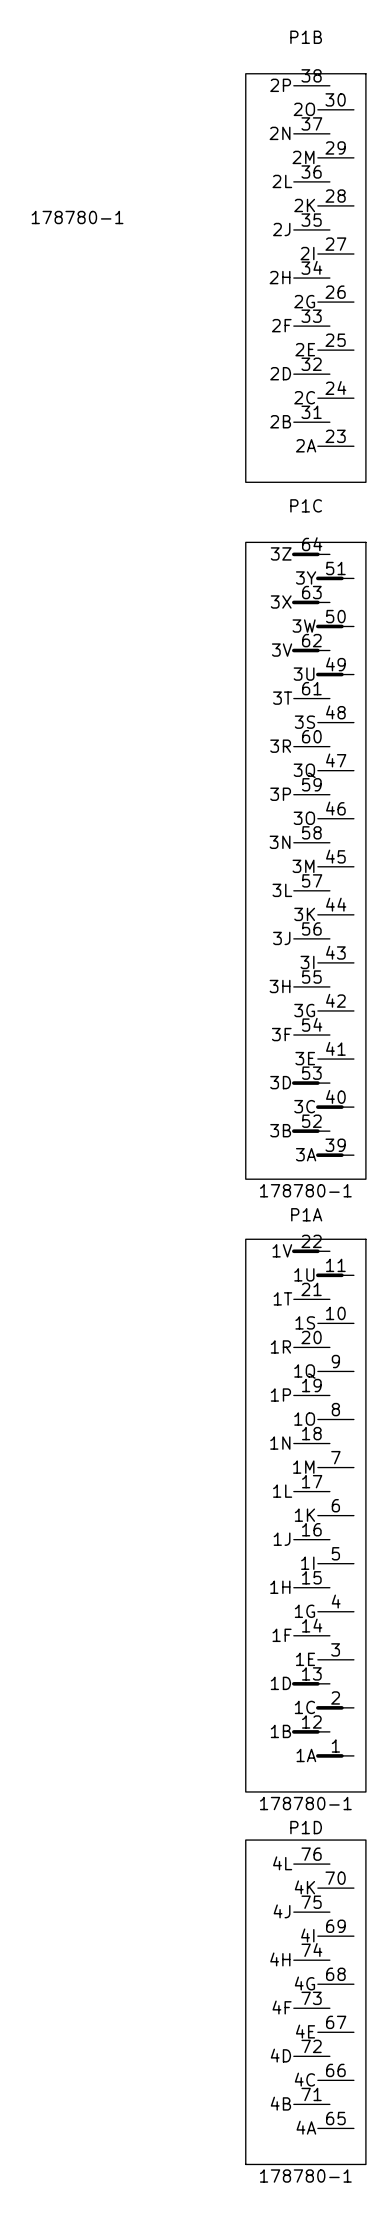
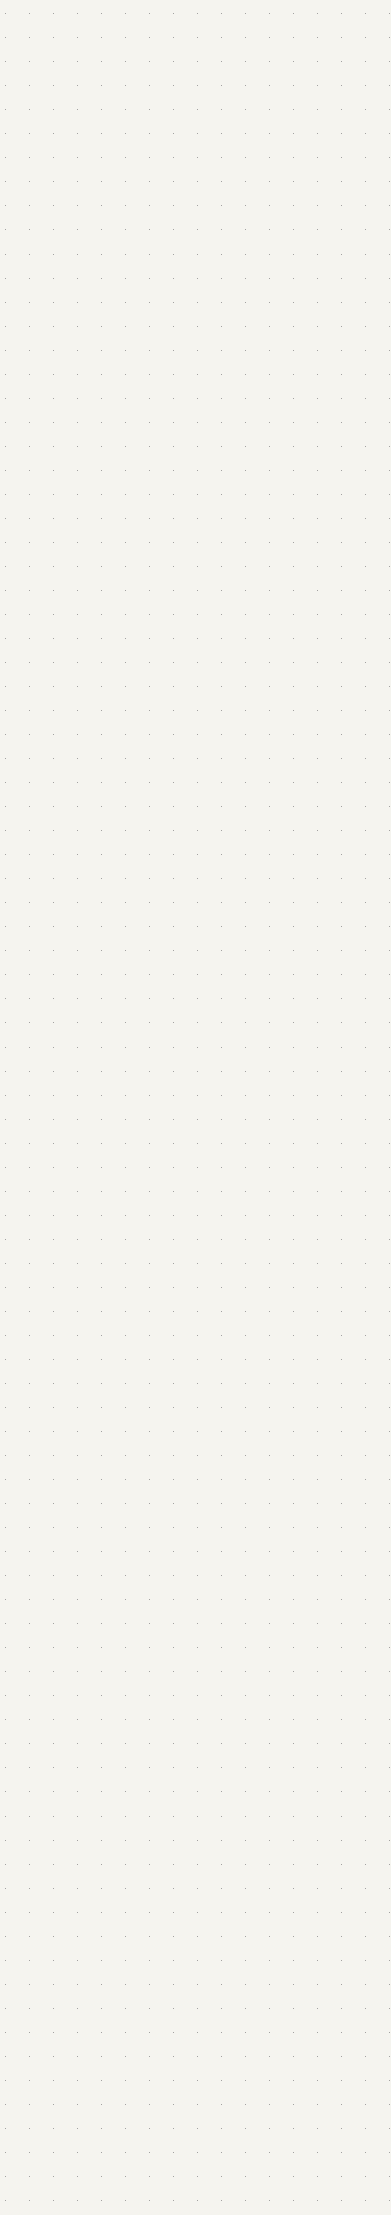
P1B: 178780-1 (305, 278) -> none
P1C: 178780-1 (305, 860) -> none
P1A: 178780-1 (305, 1515) -> none
P1D: 178780-1 (305, 2002) -> none

